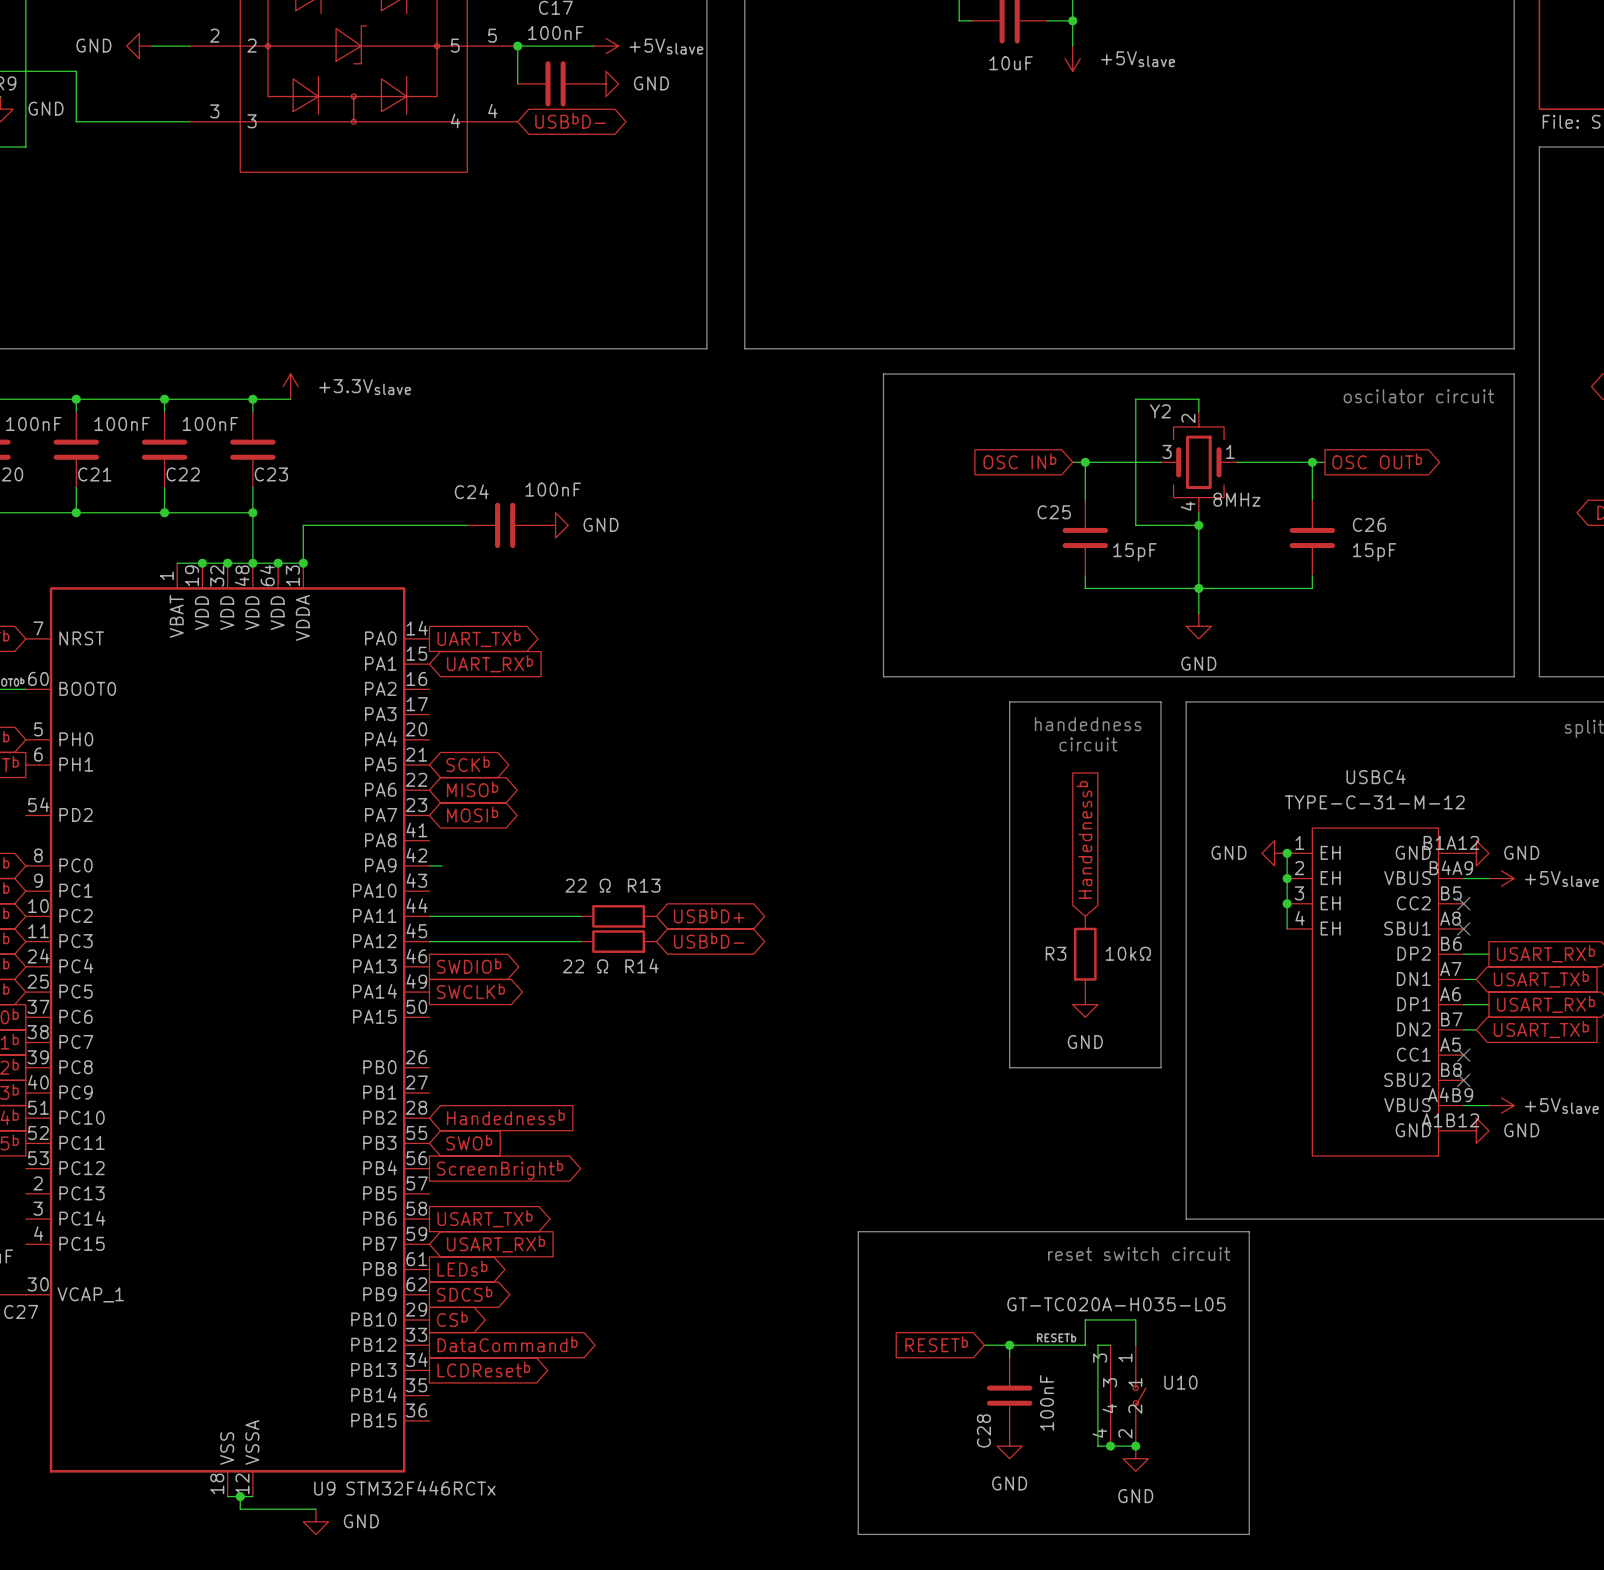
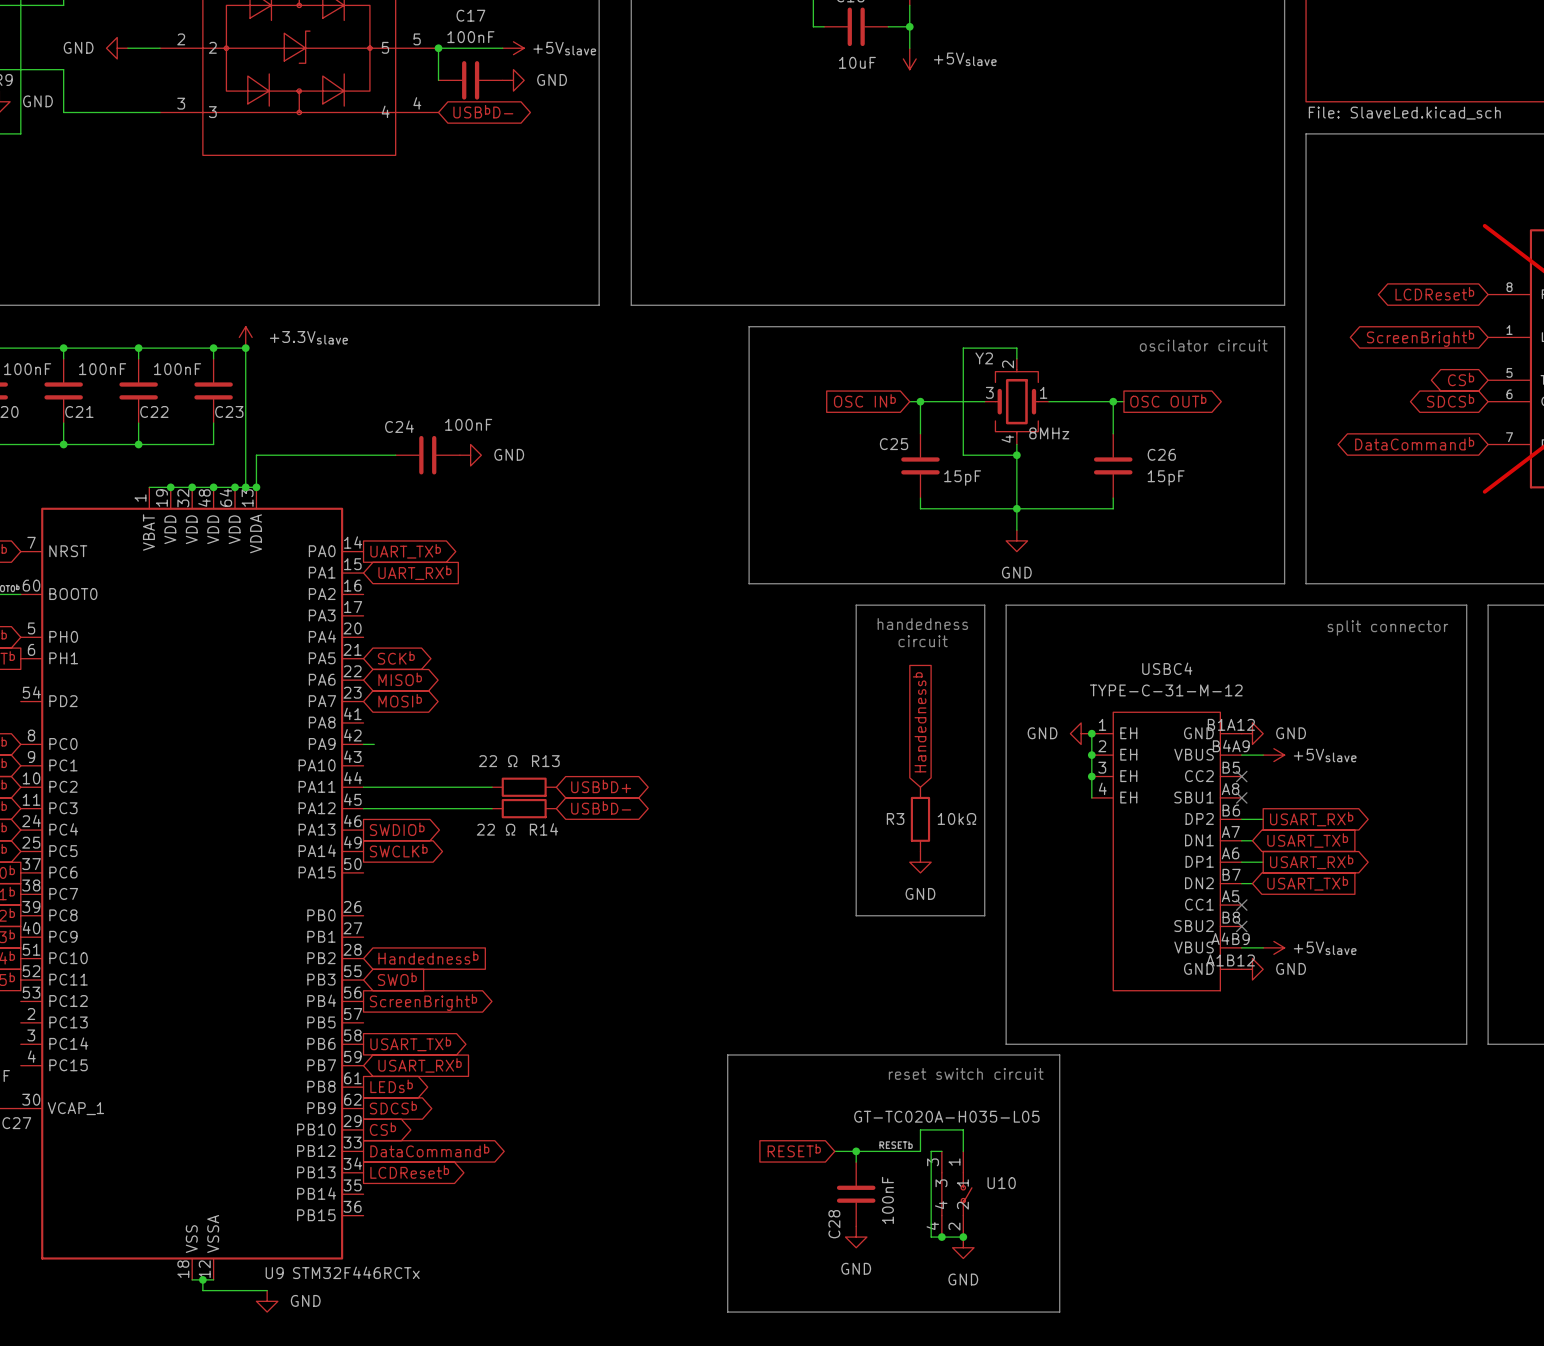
wire: none -> (245, 348) (245, 487)
junction: none -> (245, 348)
wire: (252, 512) (252, 563) -> none
junction: (252, 512) -> none
junction: none -> (245, 487)

